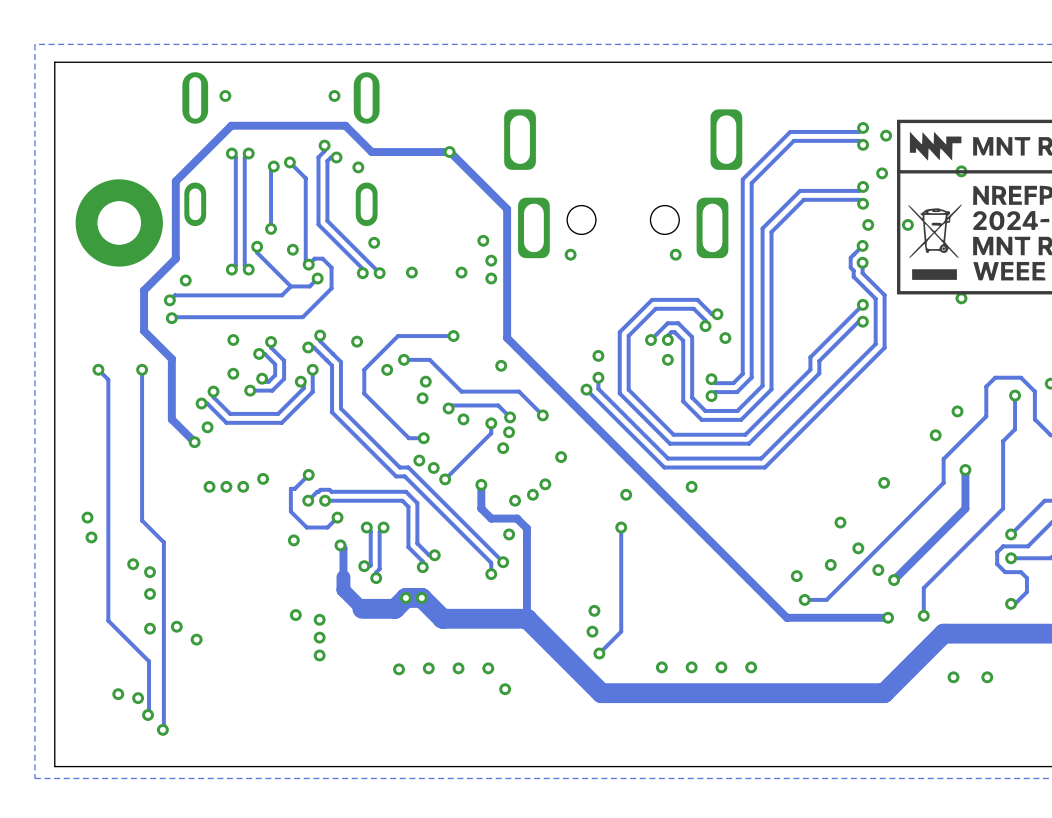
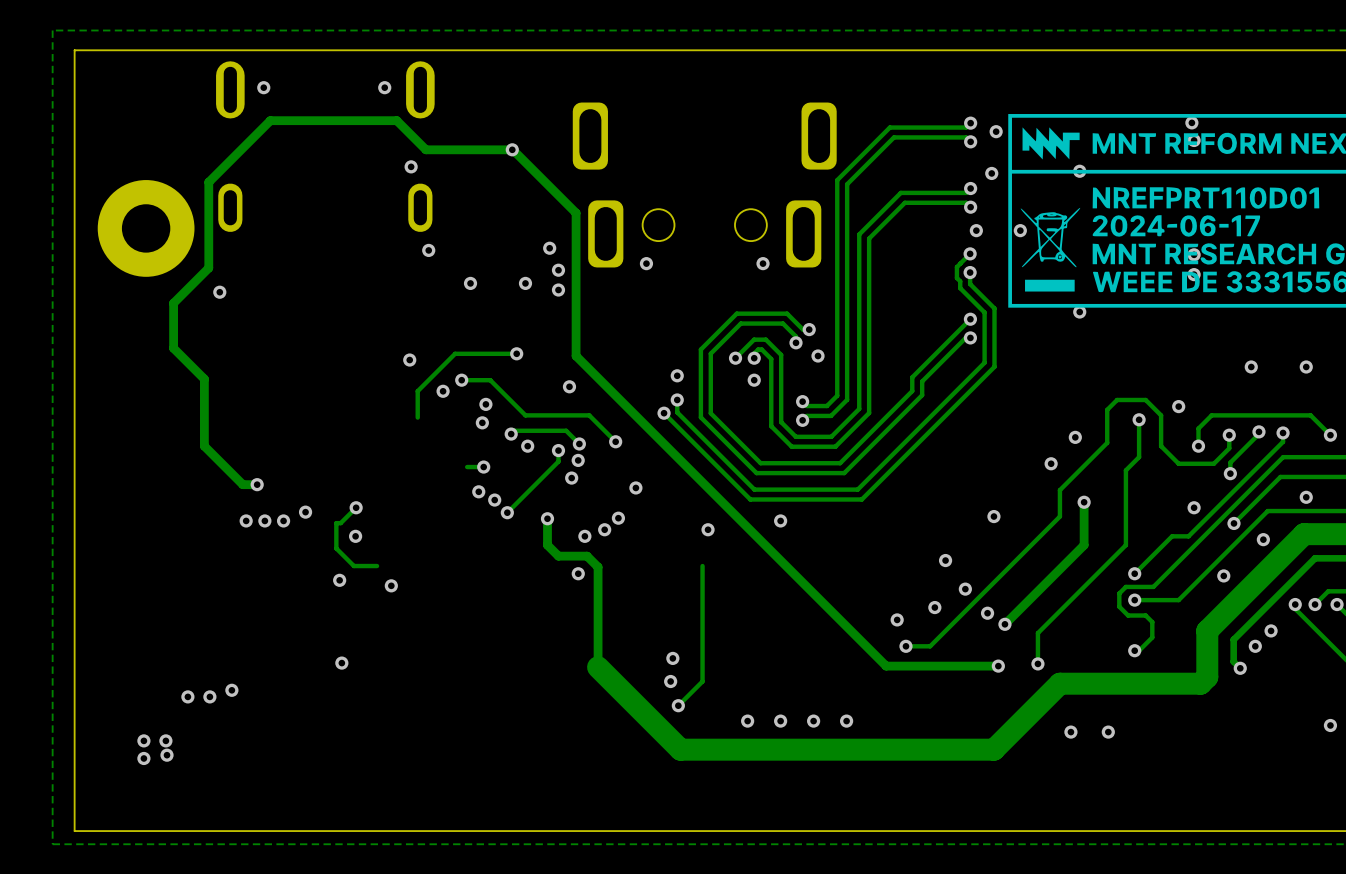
track: (324, 145) (324, 151) (318, 157) (318, 224) (362, 268) (362, 273) -> none
via: (324, 145) -> none
track: (231, 153) (235, 157) (235, 265) (231, 269) -> none
via: (231, 153) -> none
track: (248, 153) (244, 157) (244, 265) (248, 269) -> none
via: (248, 153) -> none
track: (336, 157) (330, 157) (327, 160) (327, 220) (379, 273) -> none
via: (336, 157) -> none
track: (289, 162) (305, 178) (305, 261) (308, 264) (314, 258) (322, 258) (331, 267) (331, 288) (302, 317) (171, 318) -> none
via: (289, 162) -> none
track: (273, 166) (271, 169) (271, 228) -> none
via: (273, 166) -> none
via: (271, 228) -> none
track: (257, 246) (257, 252) (290, 286) -> none
via: (257, 246) -> none
via: (292, 249) -> none
via: (308, 264) -> none
via: (231, 269) -> none
via: (248, 269) -> none
via: (362, 273) -> none
via: (379, 273) -> none
track: (317, 278) (309, 286) (290, 286) -> none
via: (317, 278) -> none
track: (290, 286) (281, 295) (174, 295) (169, 300) -> none
via: (169, 300) -> none
via: (171, 318) -> none
track: (320, 335) (320, 341) (340, 361) (340, 408) (399, 467) (408, 467) (503, 562) -> none
via: (320, 335) -> none
via: (233, 340) -> none
track: (271, 341) (271, 347) (284, 360) (284, 378) (272, 390) (250, 390) -> none
via: (271, 341) -> none
track: (308, 347) (313, 347) (332, 365) (332, 412) (396, 476) (404, 476) (491, 562) (491, 574) -> none
via: (308, 347) -> none
track: (259, 353) (264, 353) (275, 364) (275, 375) (268, 381) (262, 378) -> none
via: (259, 353) -> none
track: (98, 369) (108, 379) (108, 620) (149, 661) (148, 715) -> none
via: (98, 369) -> none
track: (142, 369) (142, 520) (163, 542) (162, 729) -> none
via: (142, 369) -> none
track: (312, 369) (312, 391) (281, 422) (226, 422) (207, 403) (201, 403) -> none
via: (312, 369) -> none
via: (233, 373) -> none
via: (262, 378) -> none
track: (300, 381) (303, 388) (278, 413) (230, 413) (213, 397) (213, 391) -> none
via: (300, 381) -> none
via: (250, 390) -> none
via: (213, 391) -> none
track: (364, 393) (408, 438) -> none
via: (201, 403) -> none
via: (207, 427) -> none
track: none -> (229, 471) (242, 484) (257, 484)
via: (194, 442) -> none
via: none -> (257, 484)
track: (308, 500) (320, 489) (329, 489) (331, 491) (406, 491) (417, 503) (417, 543) (429, 555) (434, 555) -> none
track: (325, 500) (402, 500) (408, 506) (408, 547) (422, 561) (422, 567) -> none
via: (325, 500) -> none
via: (87, 517) -> none
track: (337, 517) (327, 527) -> none
via: (337, 517) -> none
track: (366, 527) (370, 531) (370, 565) (364, 566) -> none
via: (366, 527) -> none
track: (383, 527) (379, 531) (379, 569) (376, 572) (376, 578) -> none
via: (383, 527) -> none
via: (621, 527) -> none
via: (91, 537) -> none
track: (340, 545) (343, 548) (343, 590) (362, 608) (395, 608) (405, 597) (421, 597) (442, 618) (526, 618) -> none
via: (434, 555) -> none
via: (503, 562) -> none
via: (133, 564) -> none
via: (364, 566) -> none
via: (422, 567) -> none
via: (150, 572) -> none
via: (491, 574) -> none
via: (376, 578) -> none
via: (150, 593) -> none
via: (405, 597) -> none
via: (421, 597) -> none
via: (319, 619) -> none
via: (176, 626) -> none
via: (150, 628) -> none
via: (319, 637) -> none
via: none -> (187, 696)
via: none -> (209, 696)
via: (319, 655) -> none
via: (428, 668) -> none
via: (458, 668) -> none
via: (488, 668) -> none
via: (399, 669) -> none
via: none -> (143, 740)
via: none -> (165, 740)
via: (505, 689) -> none
via: (118, 694) -> none
via: none -> (143, 758)
via: (148, 715) -> none
via: (162, 729) -> none

